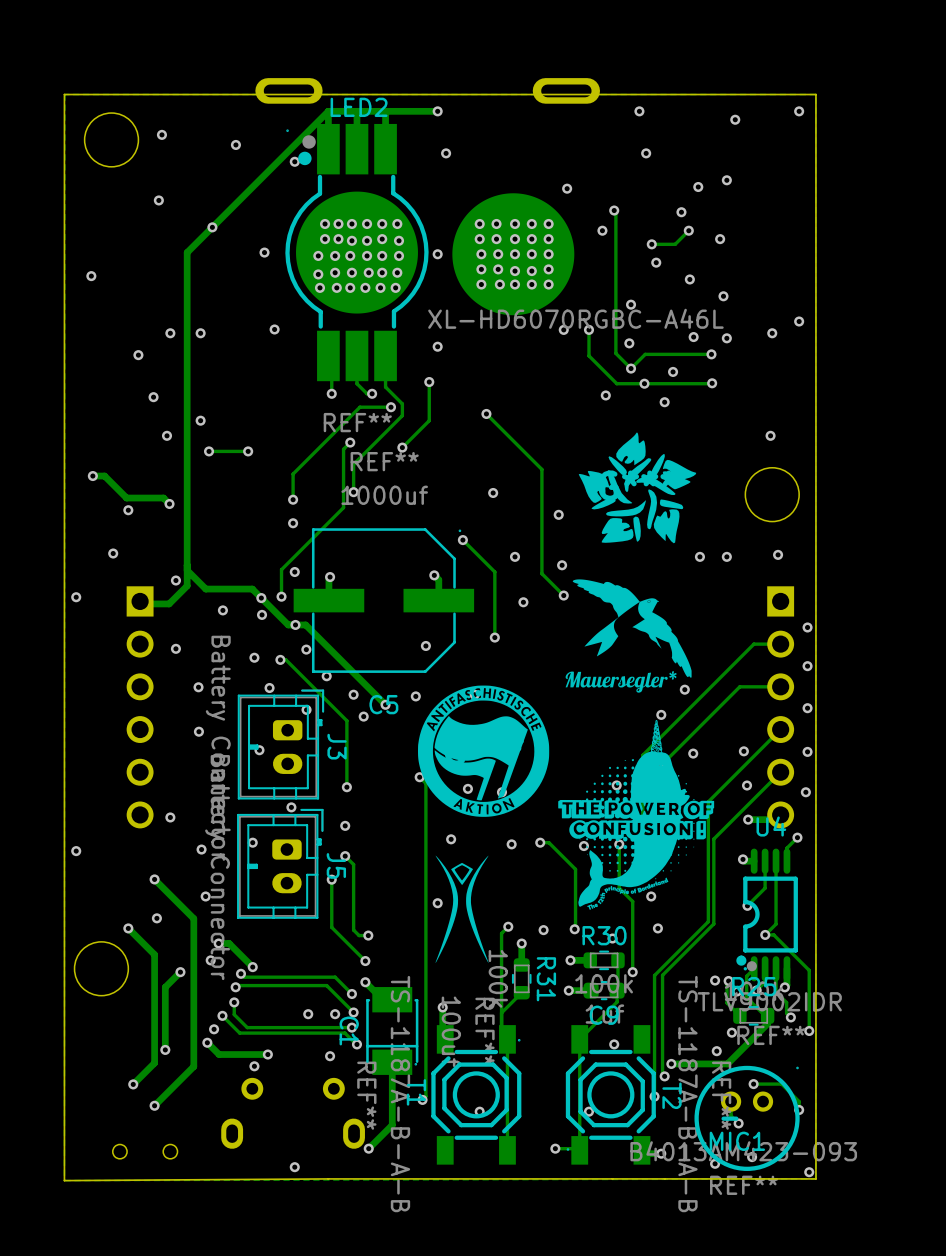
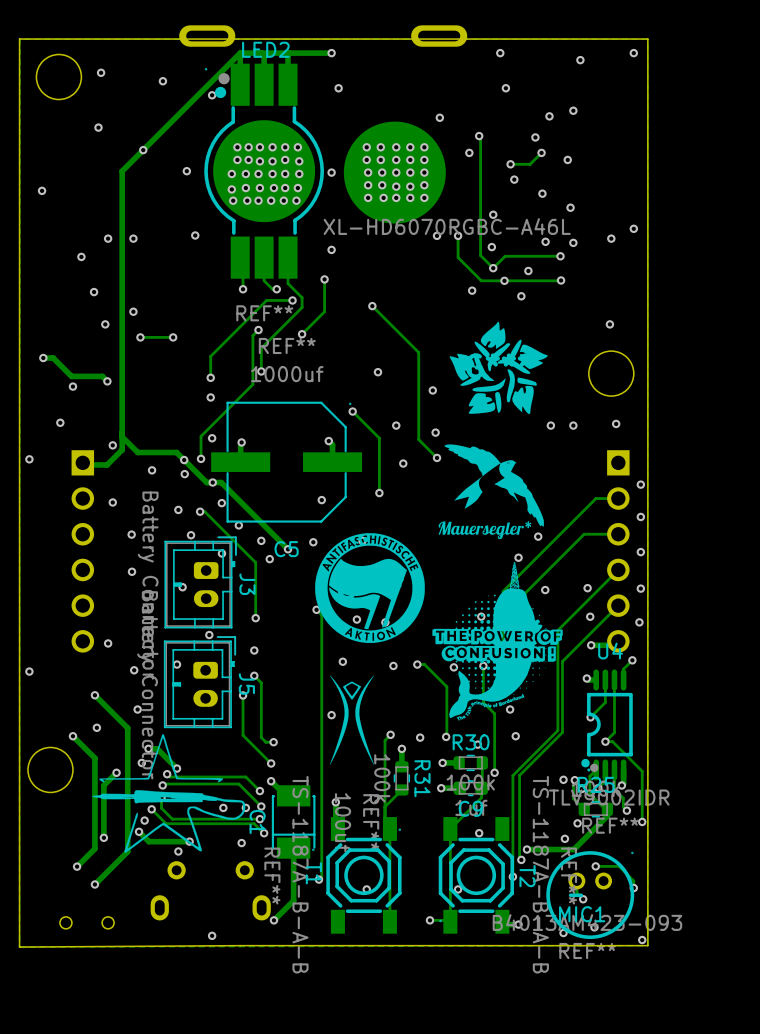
drawing: none -> [92, 733, 246, 853]

